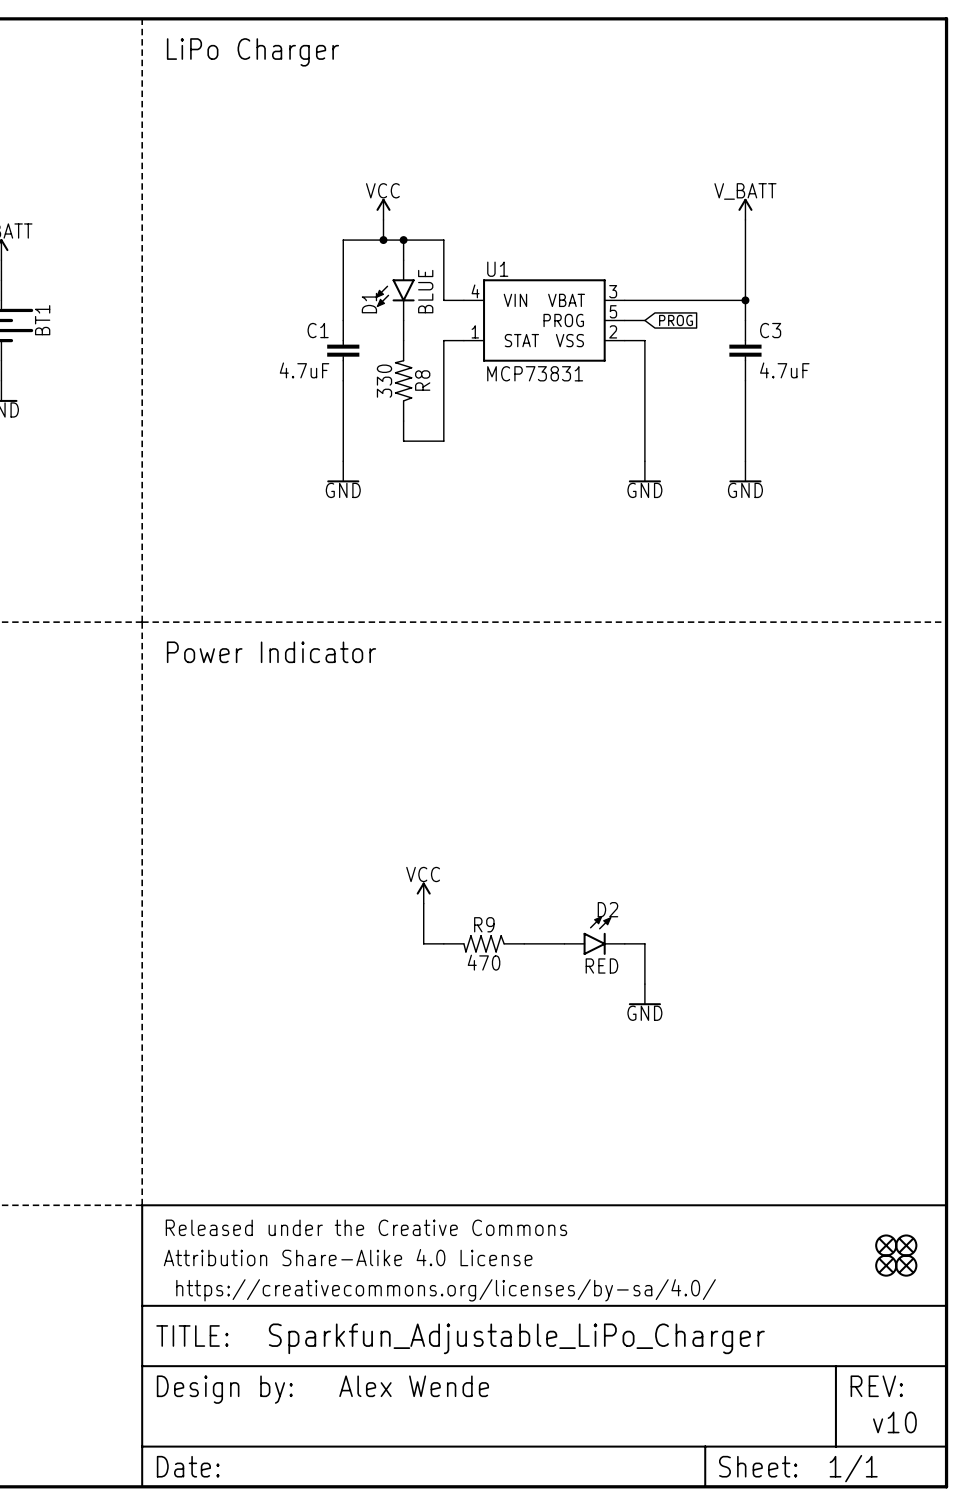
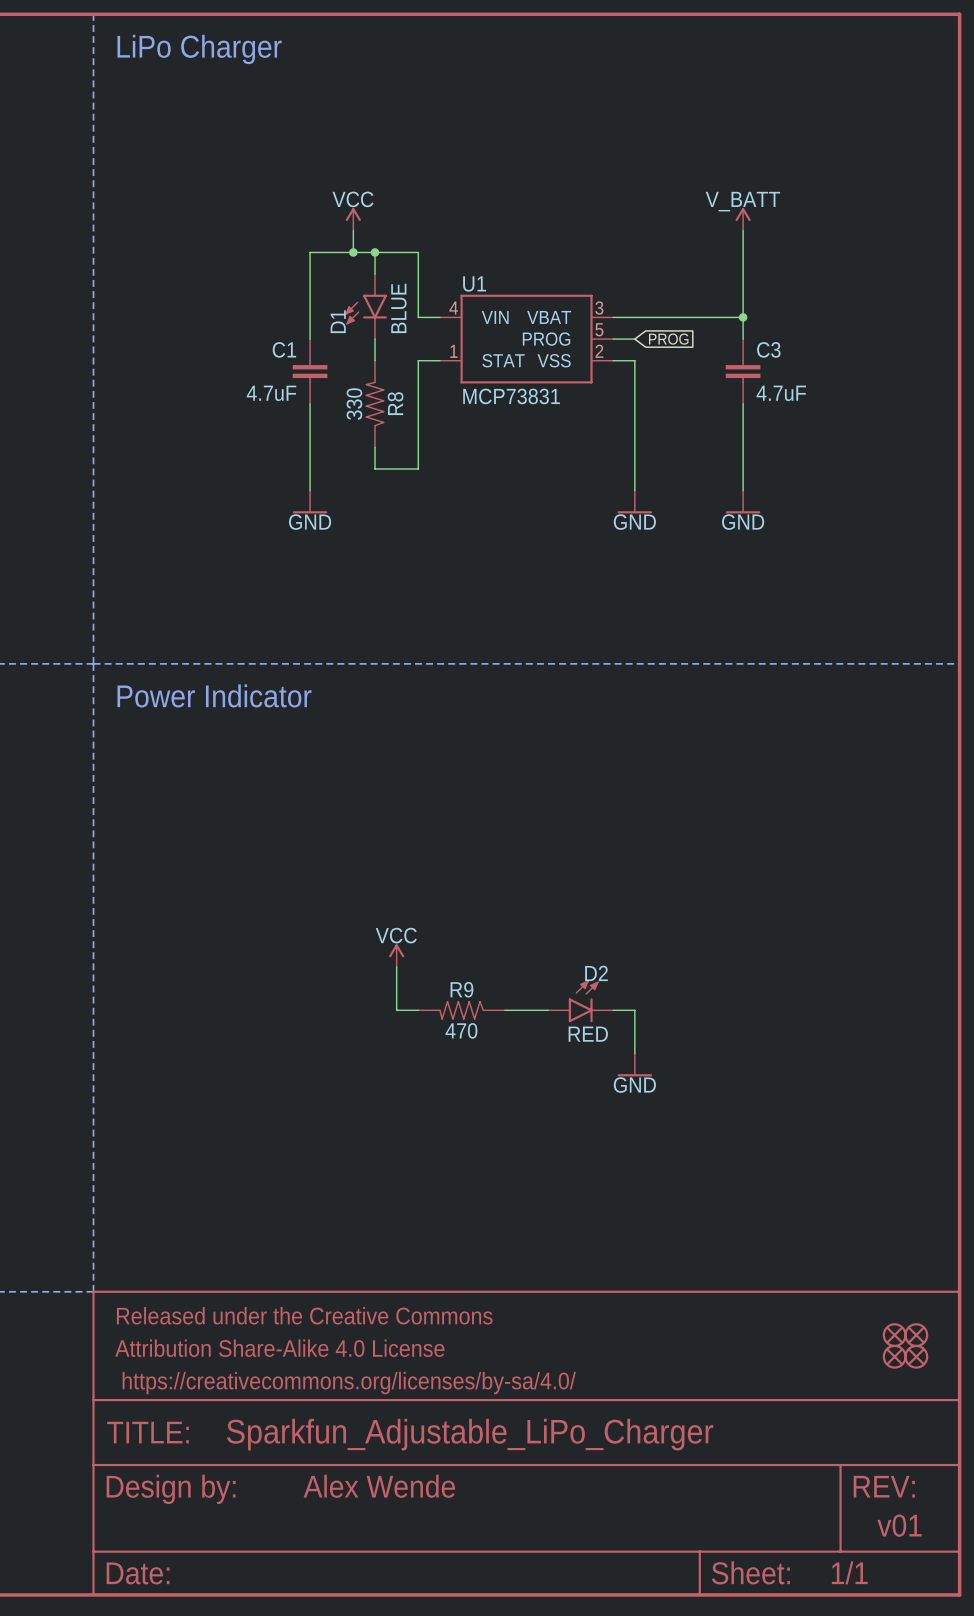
text: v10 (894, 1422) -> v01 (899, 1525)

